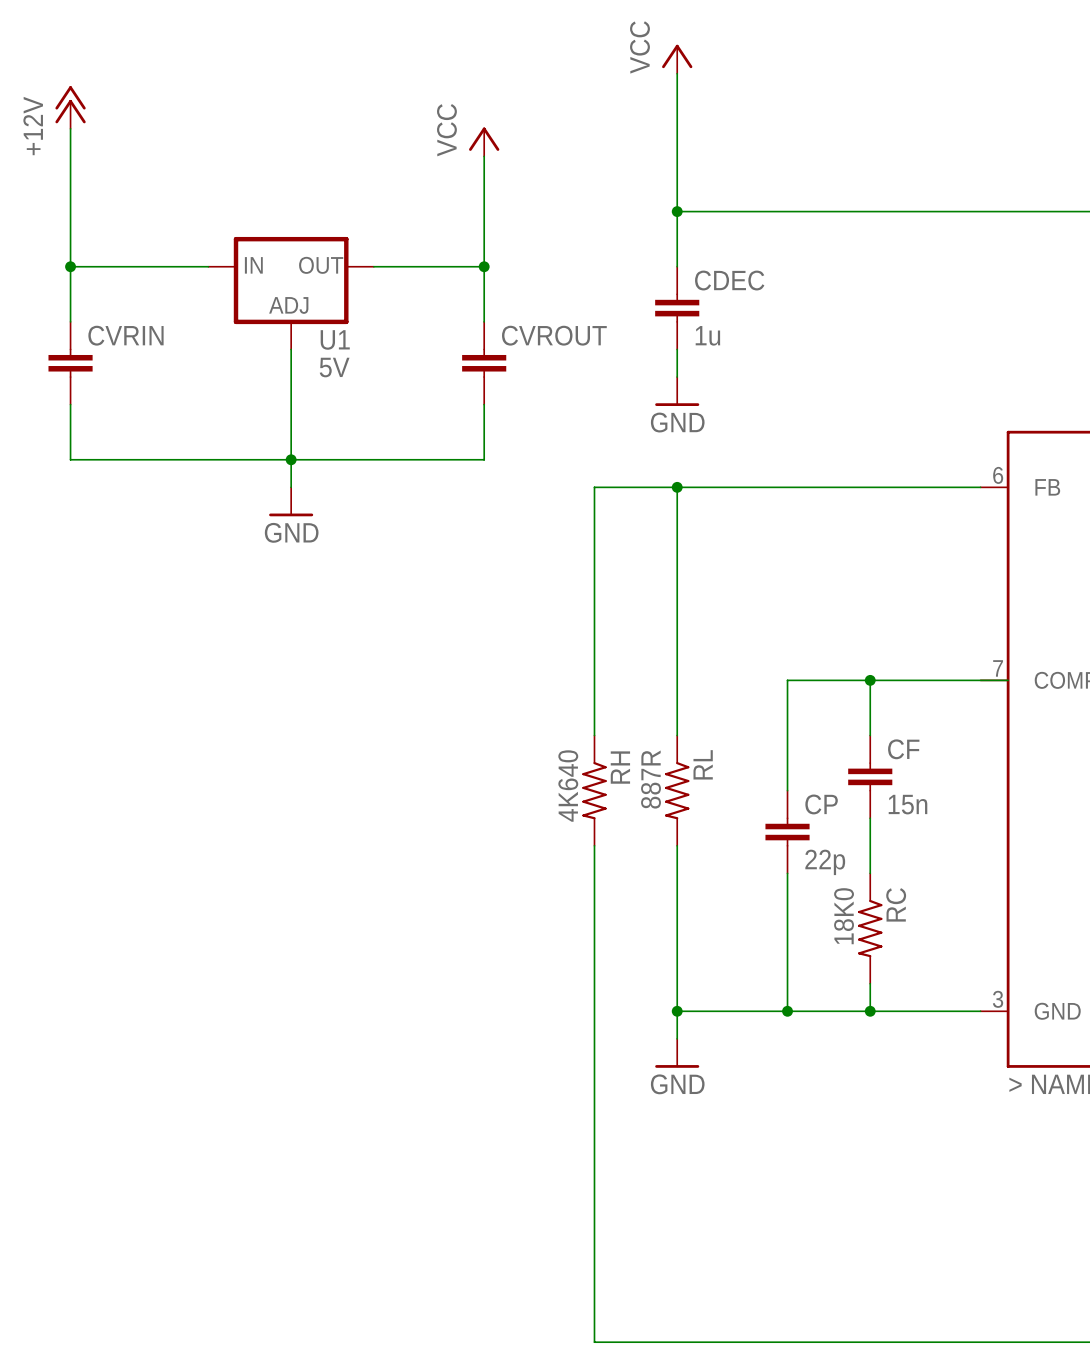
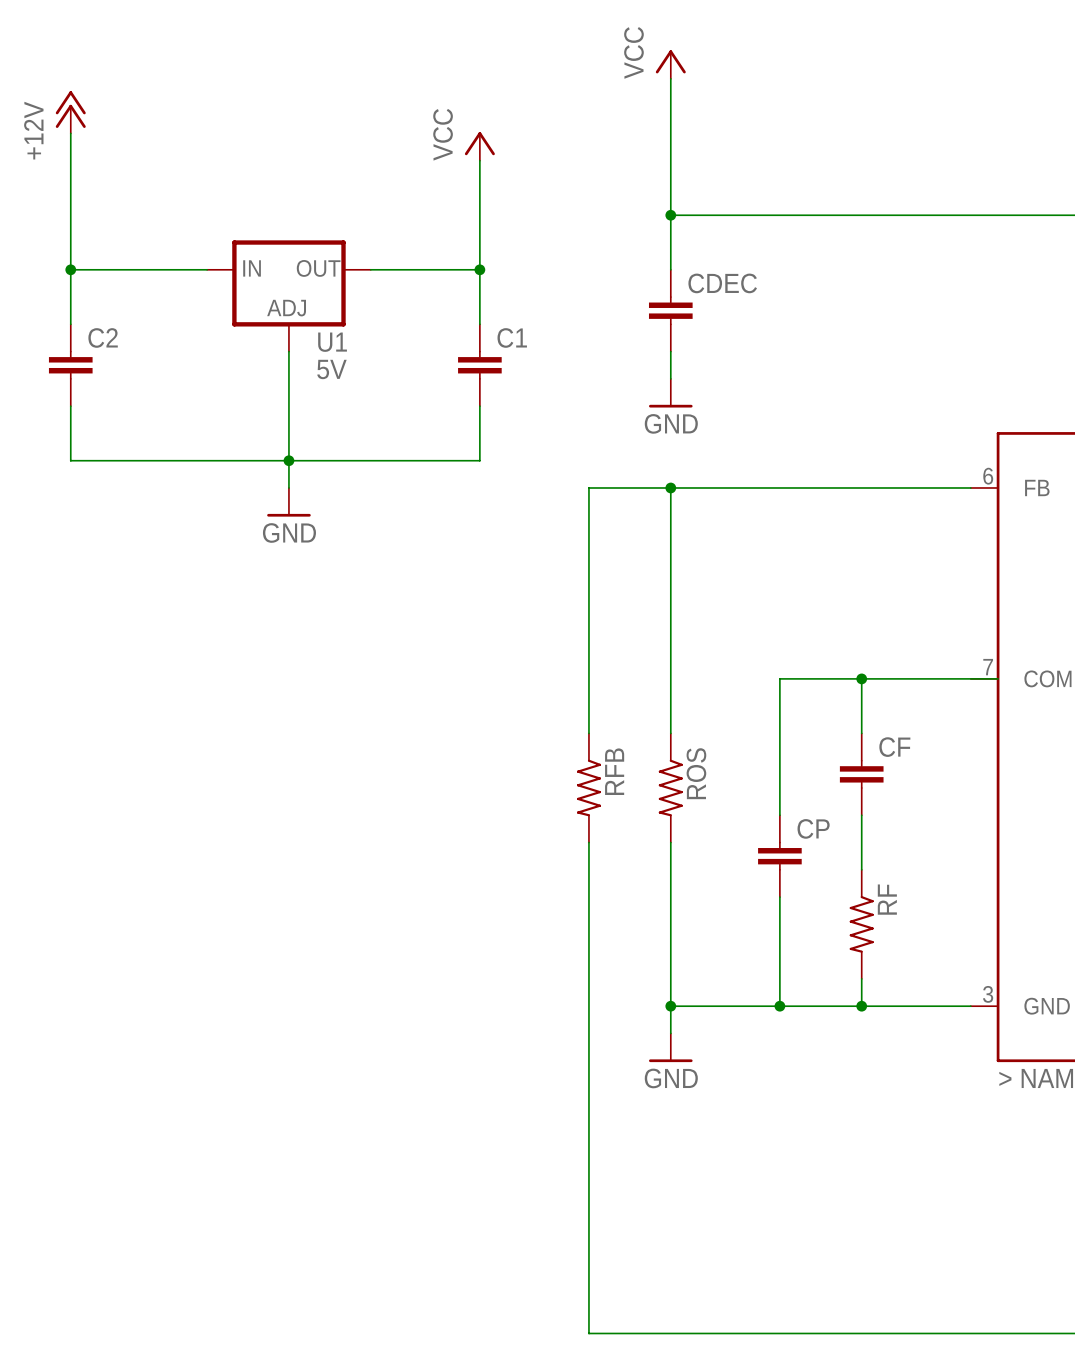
CVRIN name: CVRIN (125, 335) -> C2 (103, 337)
CVROUT name: CVROUT (554, 335) -> C1 (512, 337)
CDEC value: 1u (707, 335) -> none
RL name: RL (703, 764) -> ROS (696, 773)
RH name: RH (620, 767) -> RFB (614, 771)
RL value: 887R (651, 779) -> none
RH value: 4K640 (568, 786) -> none
CF value: 15n (908, 804) -> none
CP: 22p (787, 832) -> none
CP: none -> (779, 856)
RC name: RC (896, 904) -> RF (887, 899)
RC value: 18K0 (844, 916) -> none

